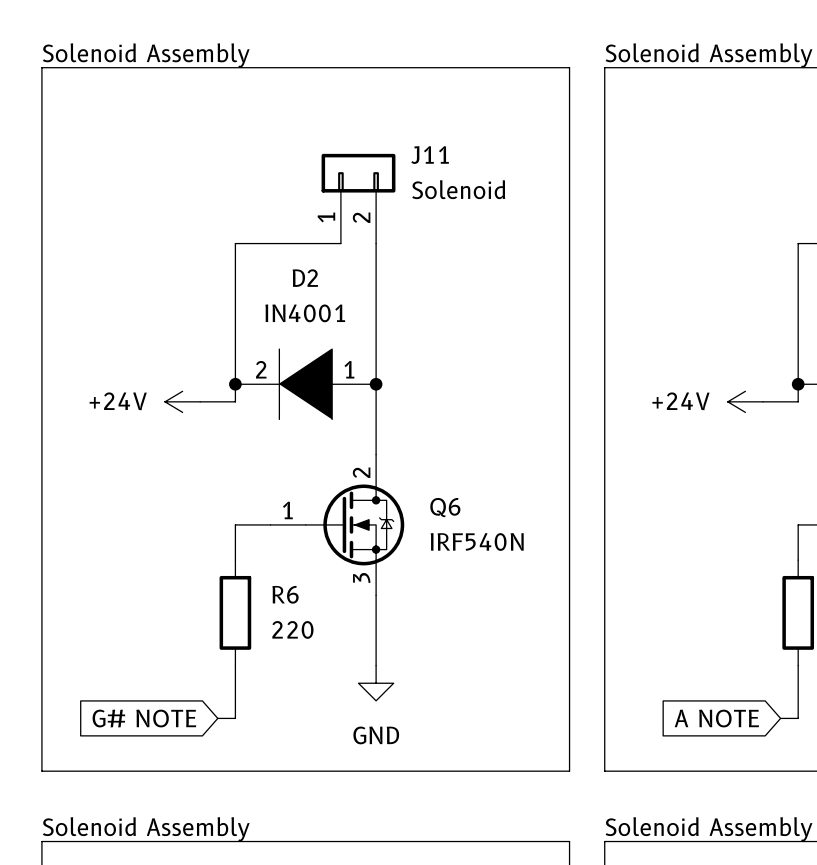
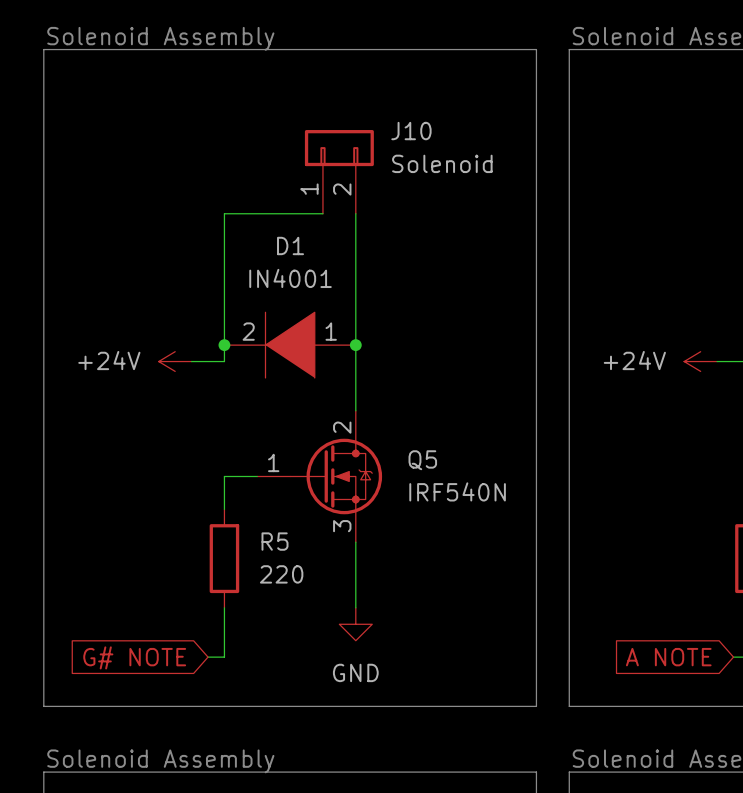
J11 name: J11 (430, 155) -> J10 (411, 131)
D2 name: D2 (305, 278) -> D1 (290, 245)
Q6 name: Q6 (445, 507) -> Q5 (422, 460)
R6 name: R6 (285, 594) -> R5 (275, 541)

